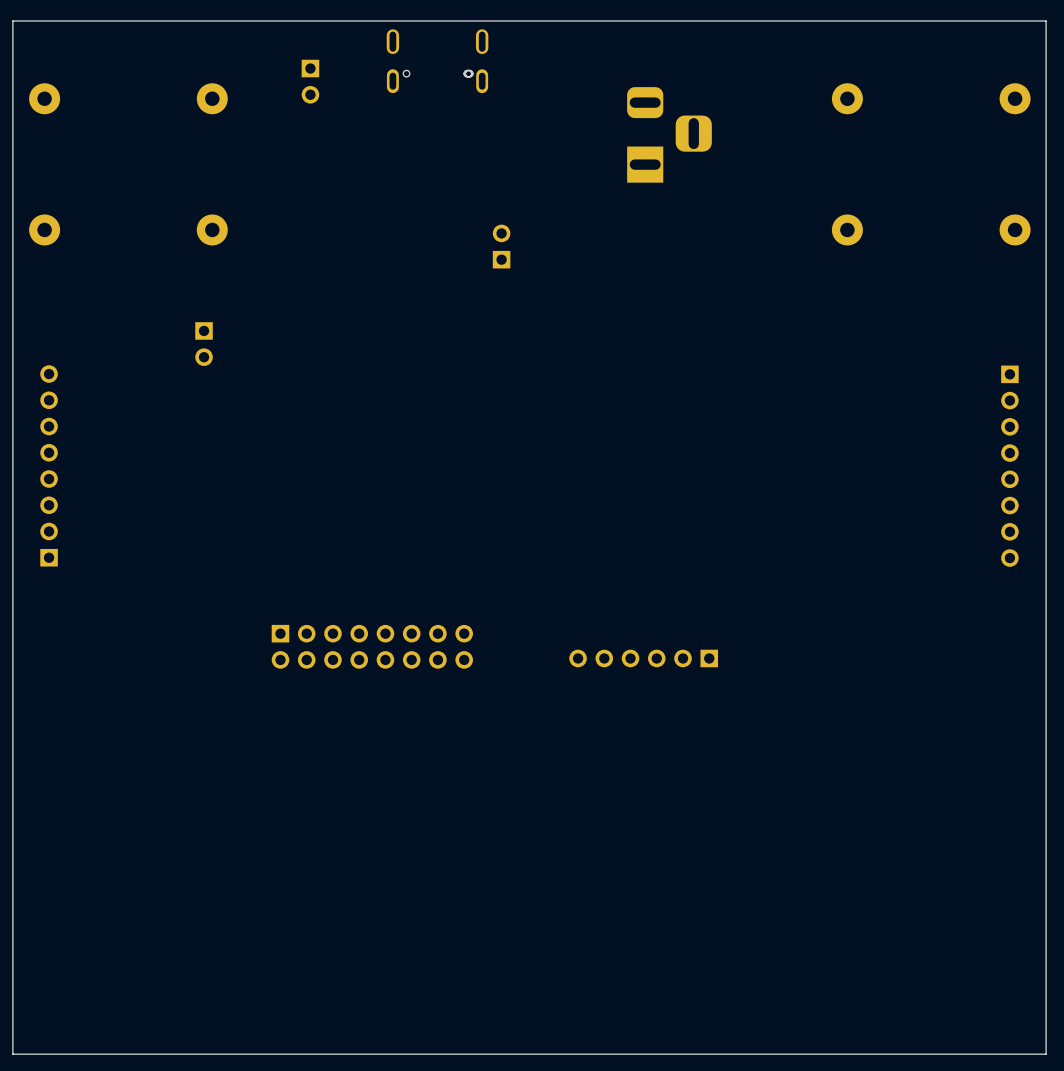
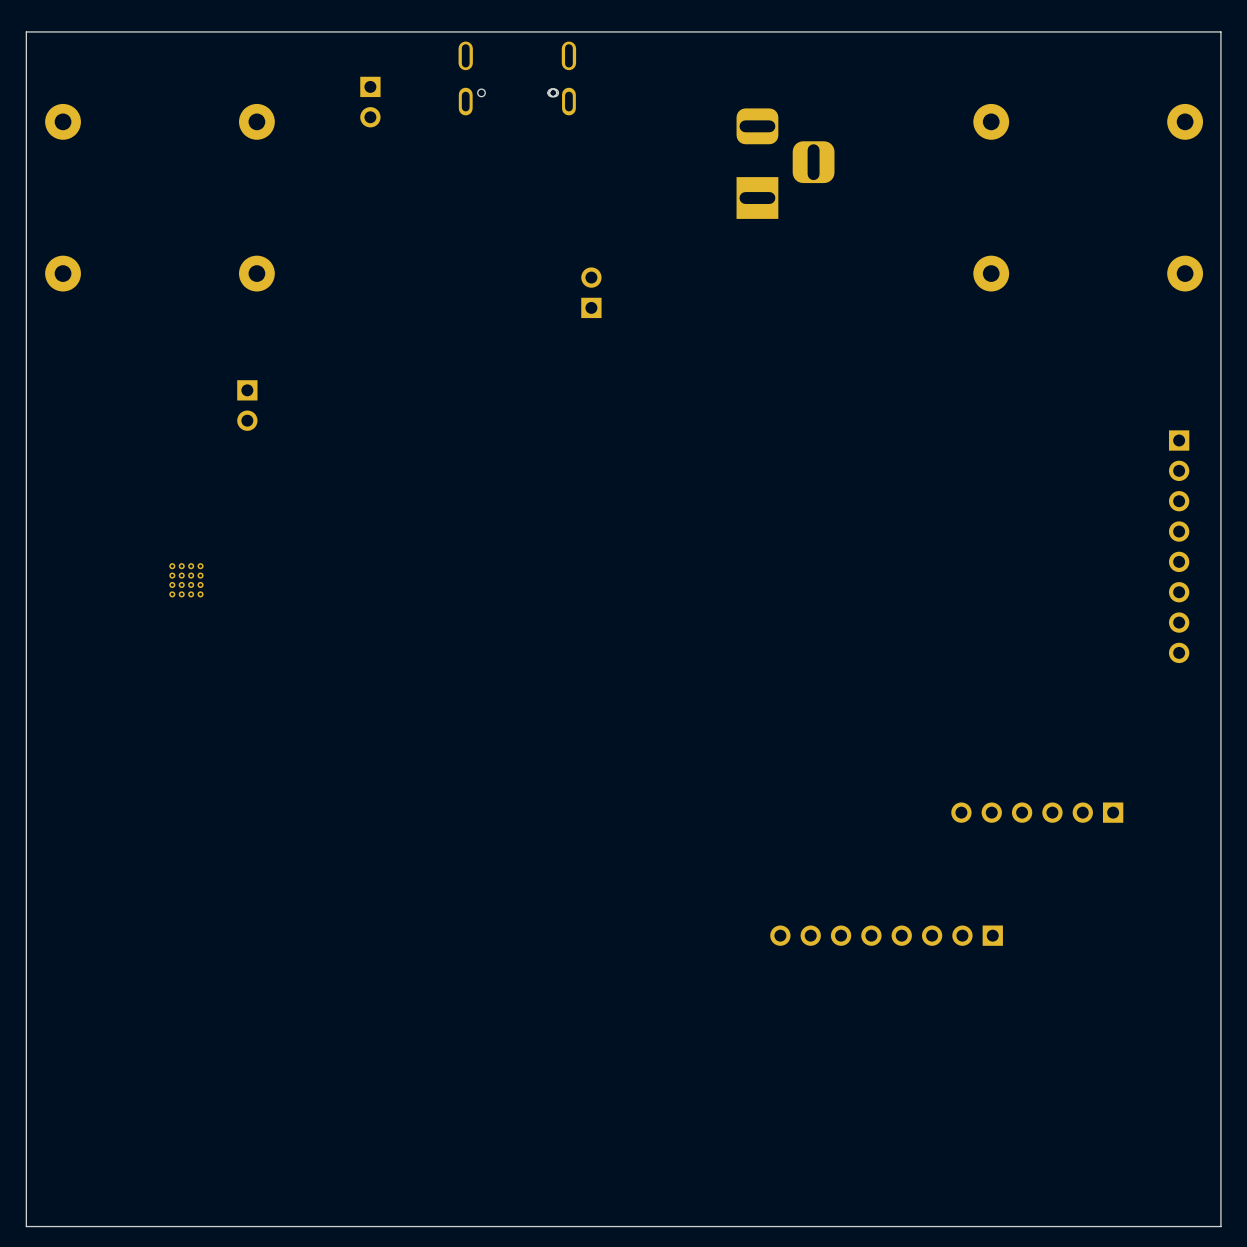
part: (49, 465) -> none
part: none -> (186, 580)
part: (372, 646) -> none
part position: (643, 658) -> (1037, 812)
part: none -> (886, 935)

